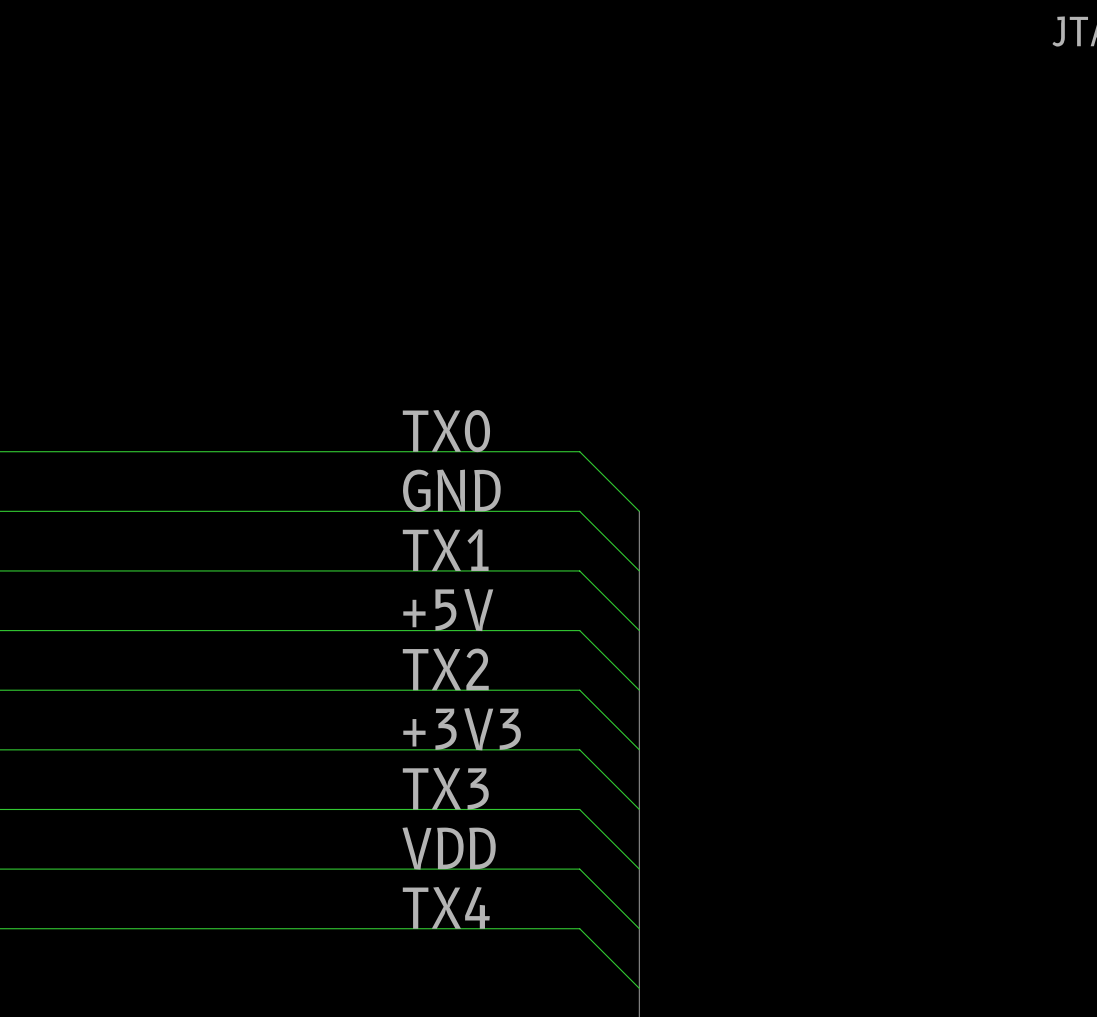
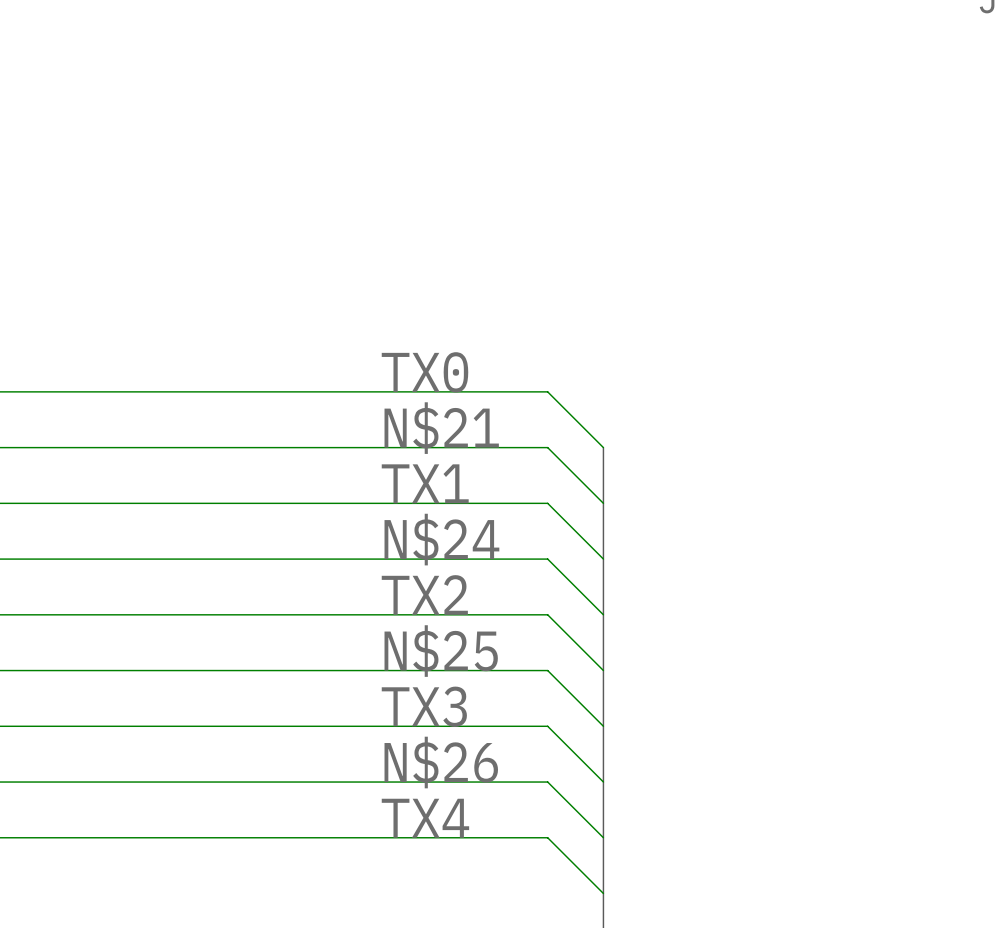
label: GND (451, 490) -> N$21 (441, 428)
label: +5V (448, 610) -> N$24 (441, 539)
label: +3V3 (462, 729) -> N$25 (441, 651)
label: VDD (449, 848) -> N$26 (441, 762)

